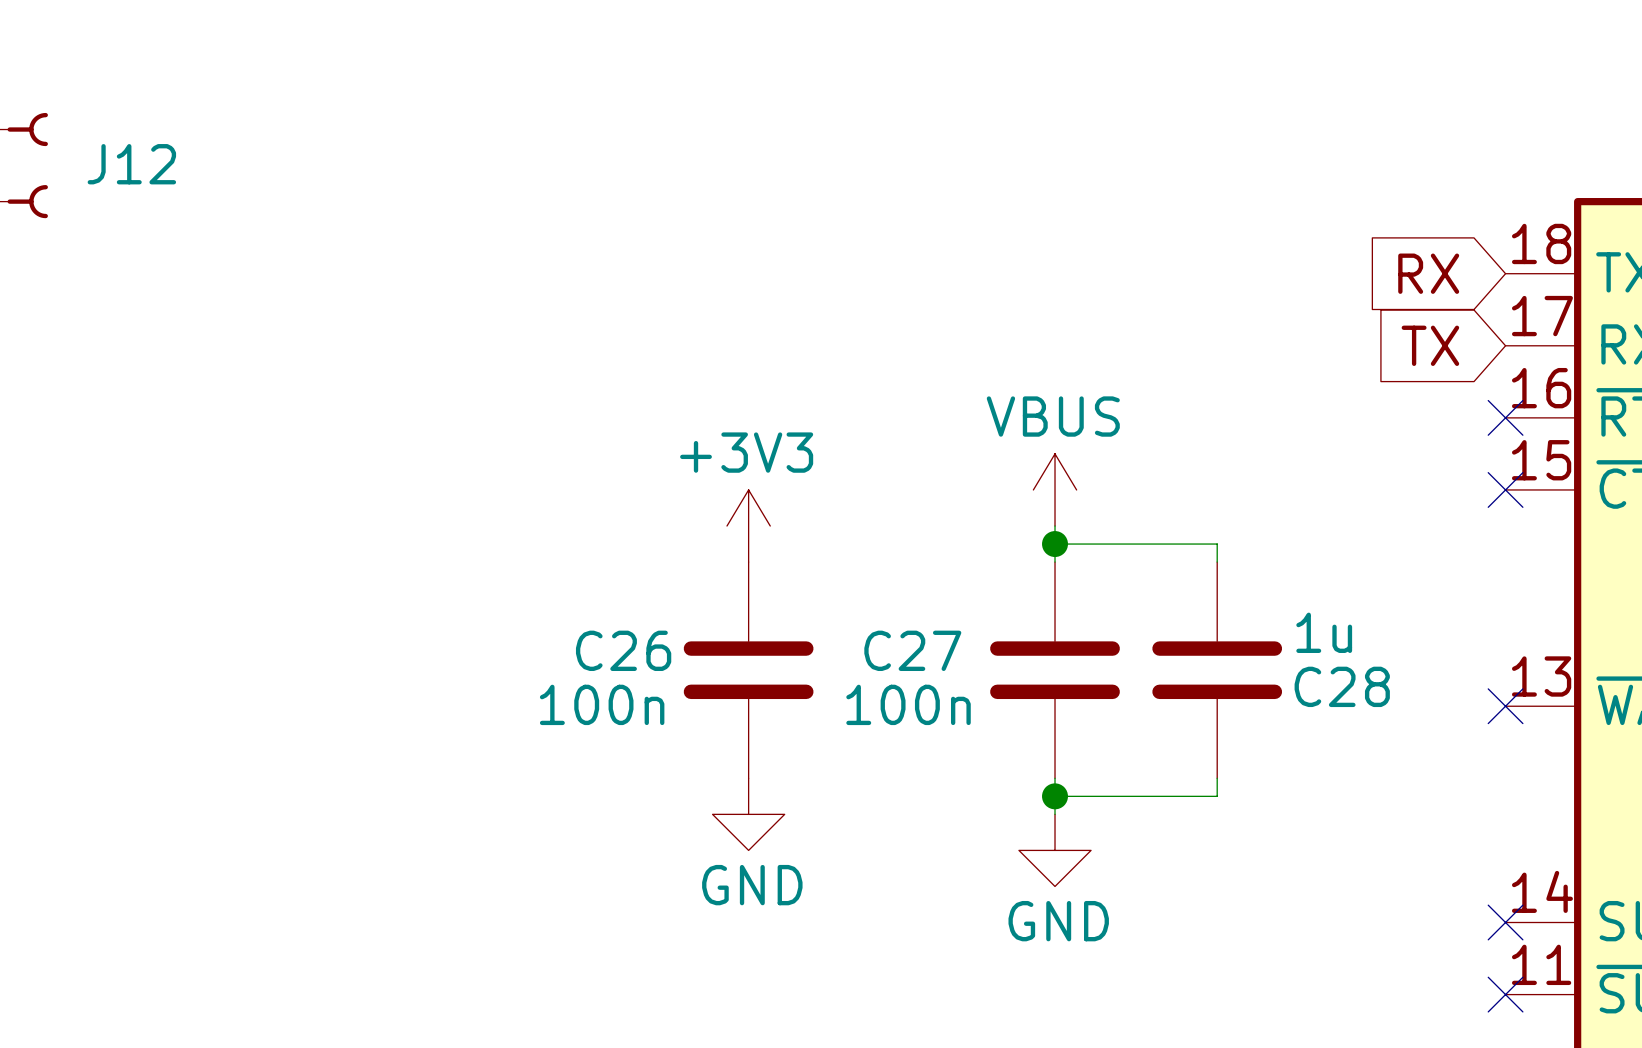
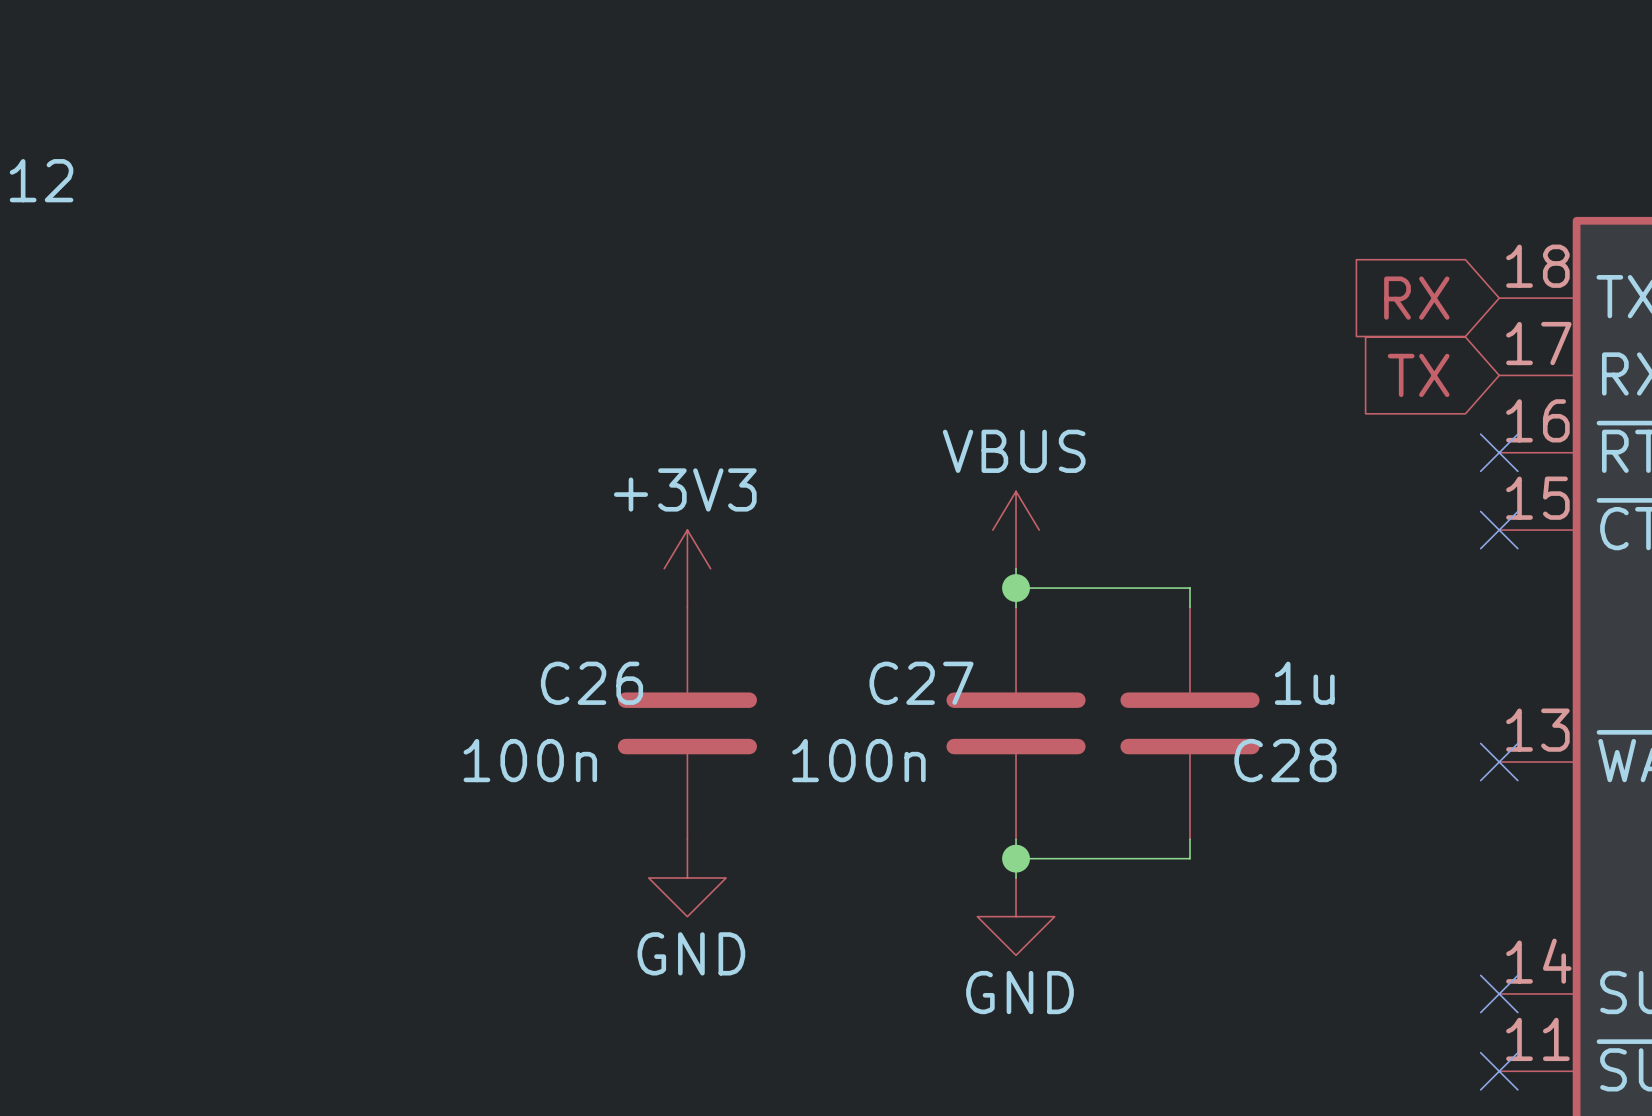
C26 name position: C26 (623, 650) -> C26 (591, 683)
C27 name position: C27 (912, 650) -> C27 (921, 683)
C28 name position: C28 (1342, 686) -> C28 (1285, 760)

